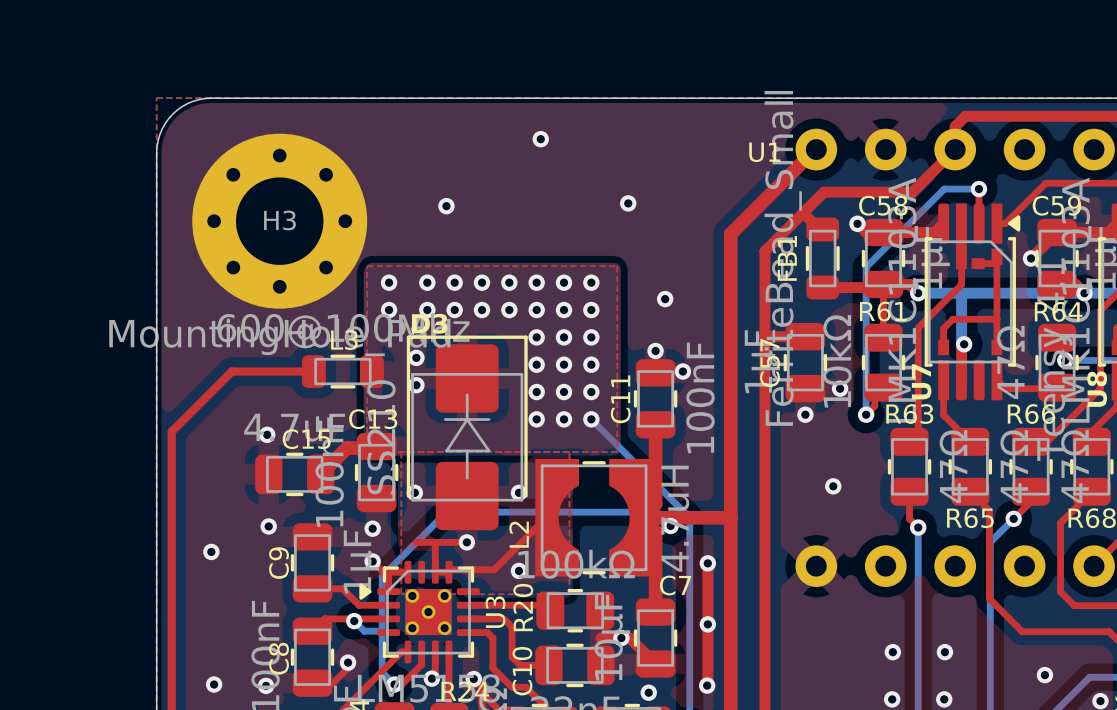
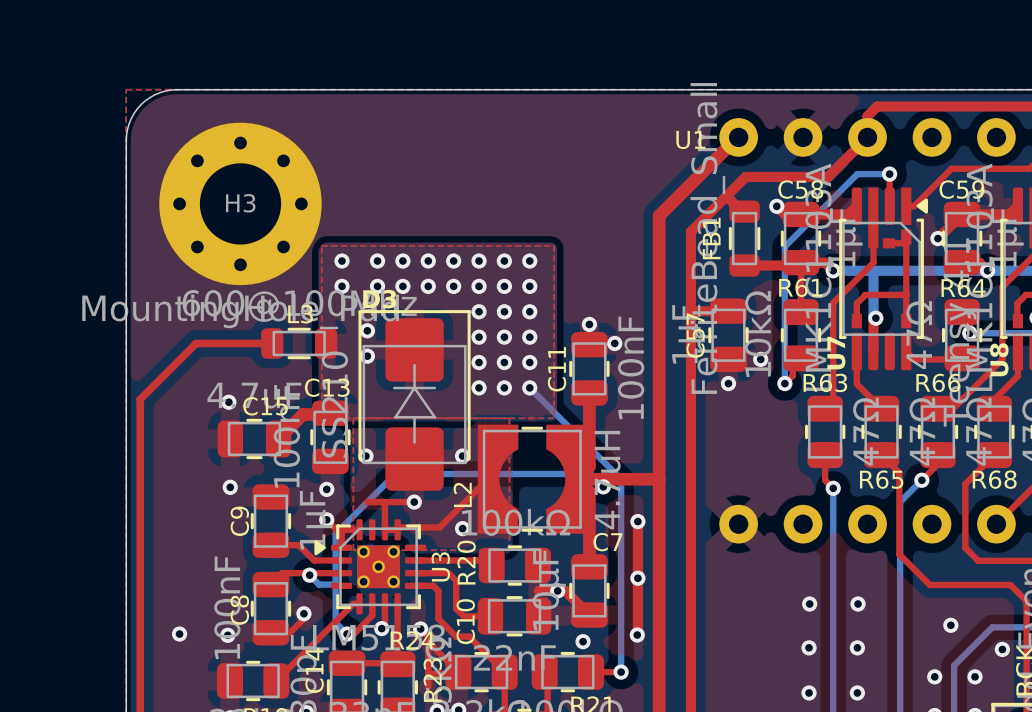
via: (540, 139) -> none
via: (628, 203) -> none
via: (446, 206) -> none
via: (665, 299) -> none
via: (833, 486) -> none
via: (211, 551) -> none

